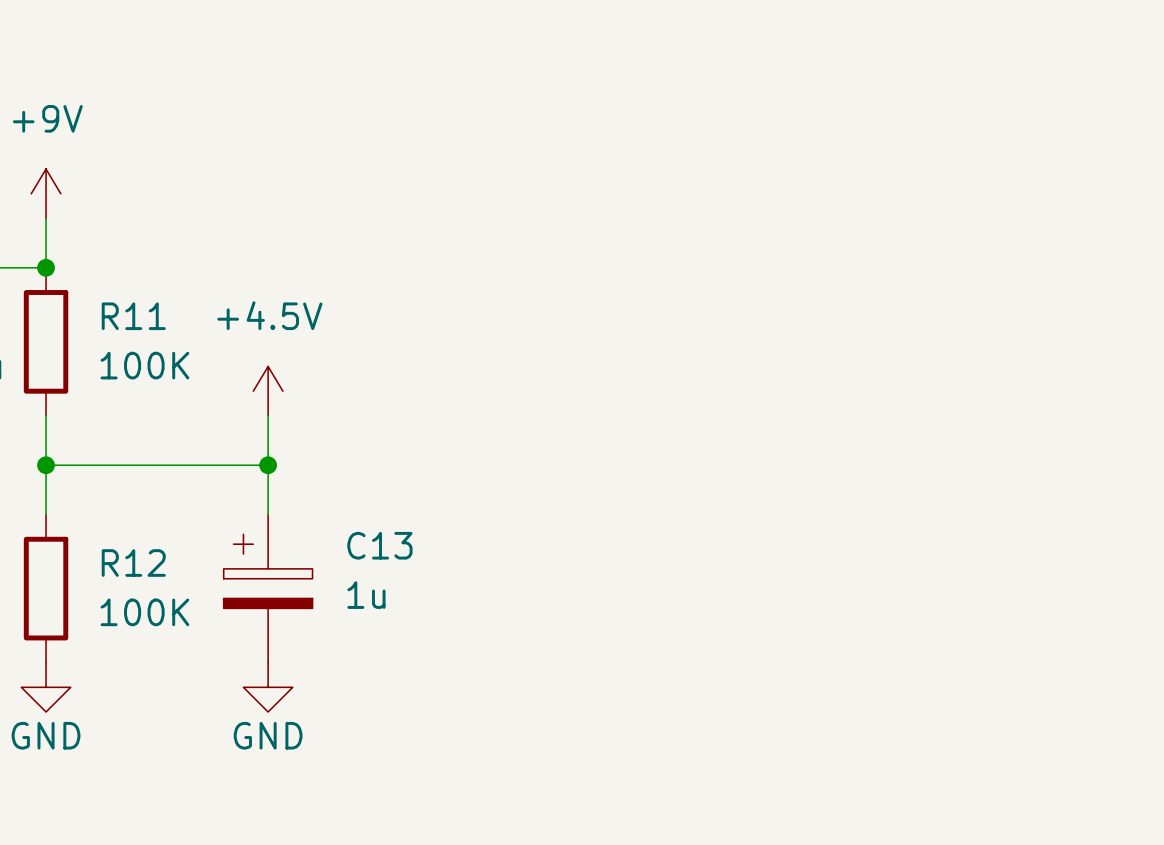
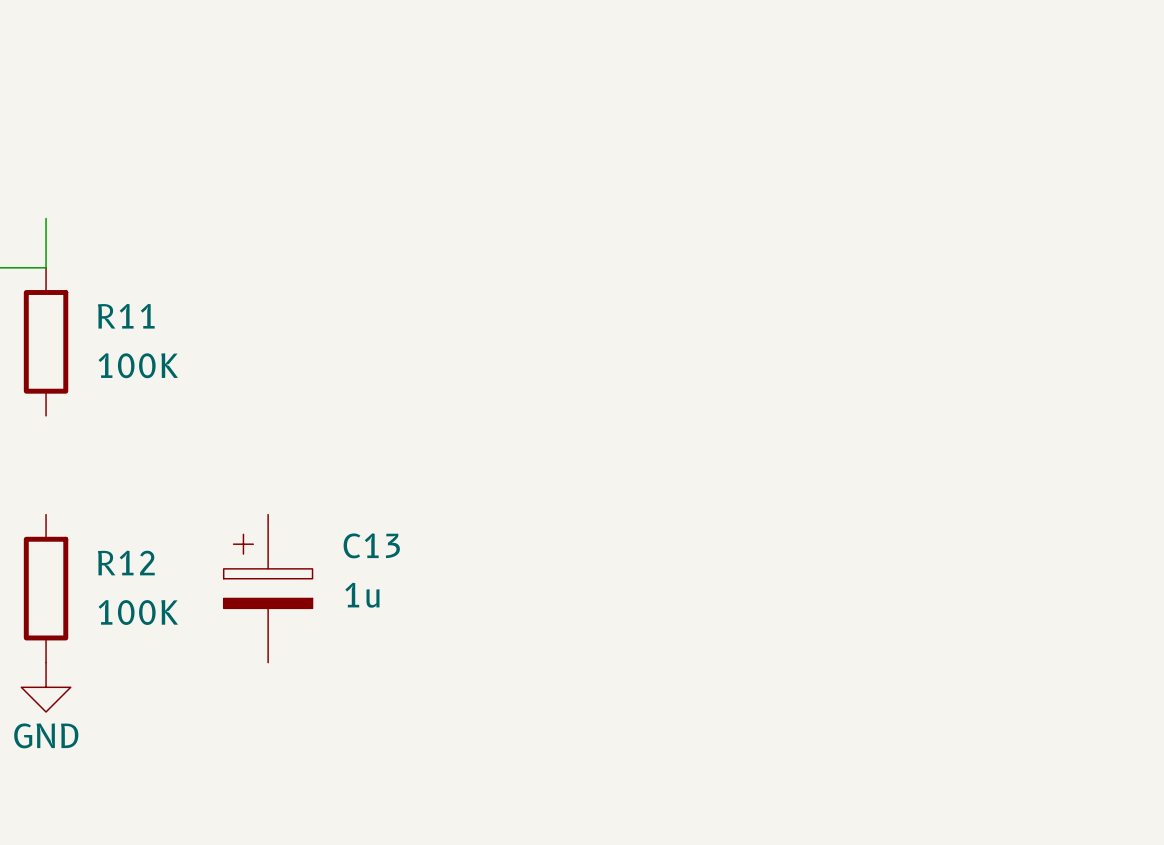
power symbol: +9V (46, 193) -> none
junction: (46, 267) -> none
power symbol: +4.5V (268, 391) -> none
wire: (46, 415) (46, 514) -> none
wire: (268, 415) (268, 514) -> none
wire: (46, 465) (268, 465) -> none
junction: (46, 465) -> none
junction: (268, 465) -> none
power symbol: GND (268, 687) -> none

